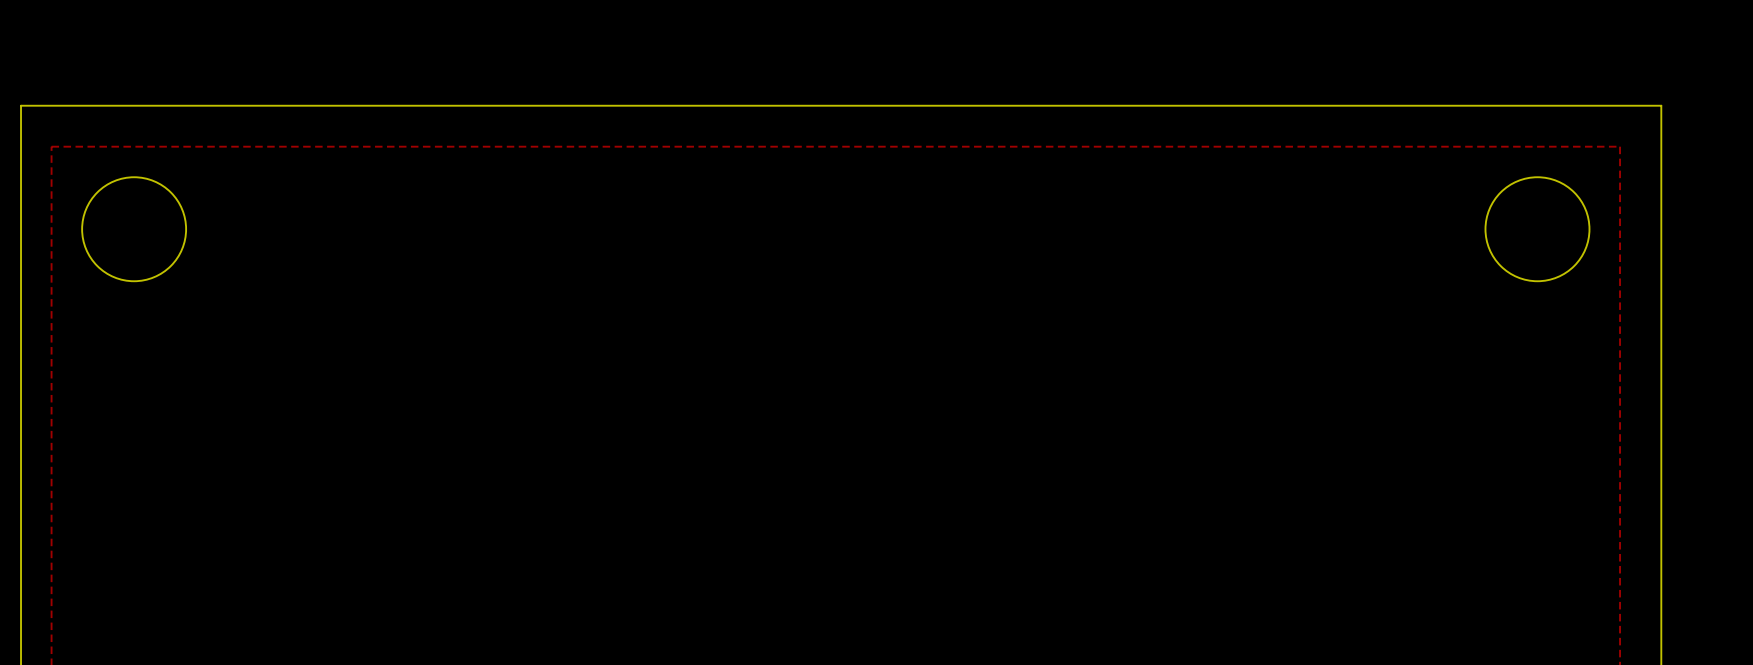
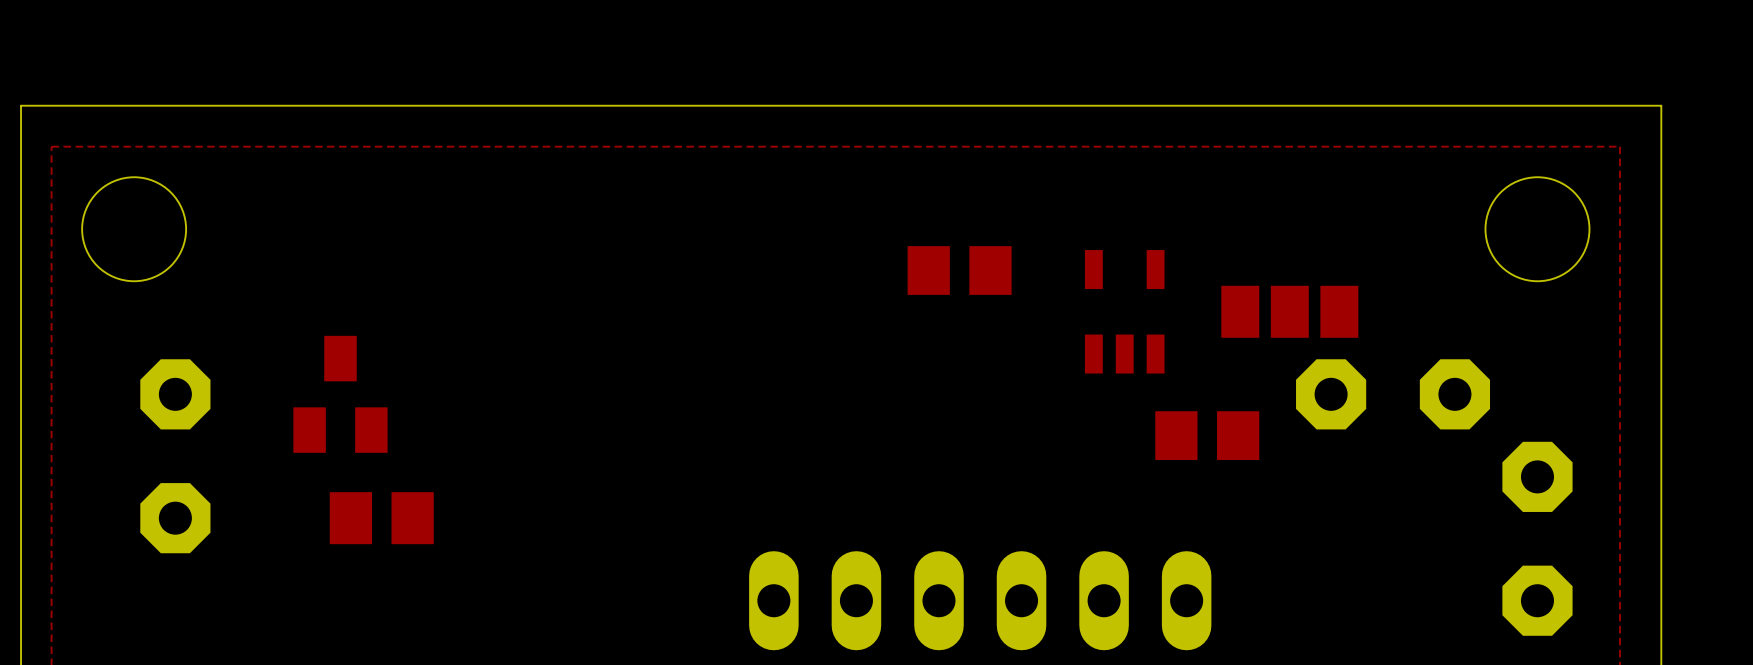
part: none -> (959, 270)
part: none -> (1124, 311)
part: none -> (1289, 311)
part: none -> (175, 394)
part: none -> (340, 394)
part: none -> (1331, 394)
part: none -> (1454, 394)
part: none -> (1207, 435)
part: none -> (1537, 476)
part: none -> (175, 518)
part: none -> (381, 518)
part: none -> (980, 600)
part: none -> (1537, 600)

